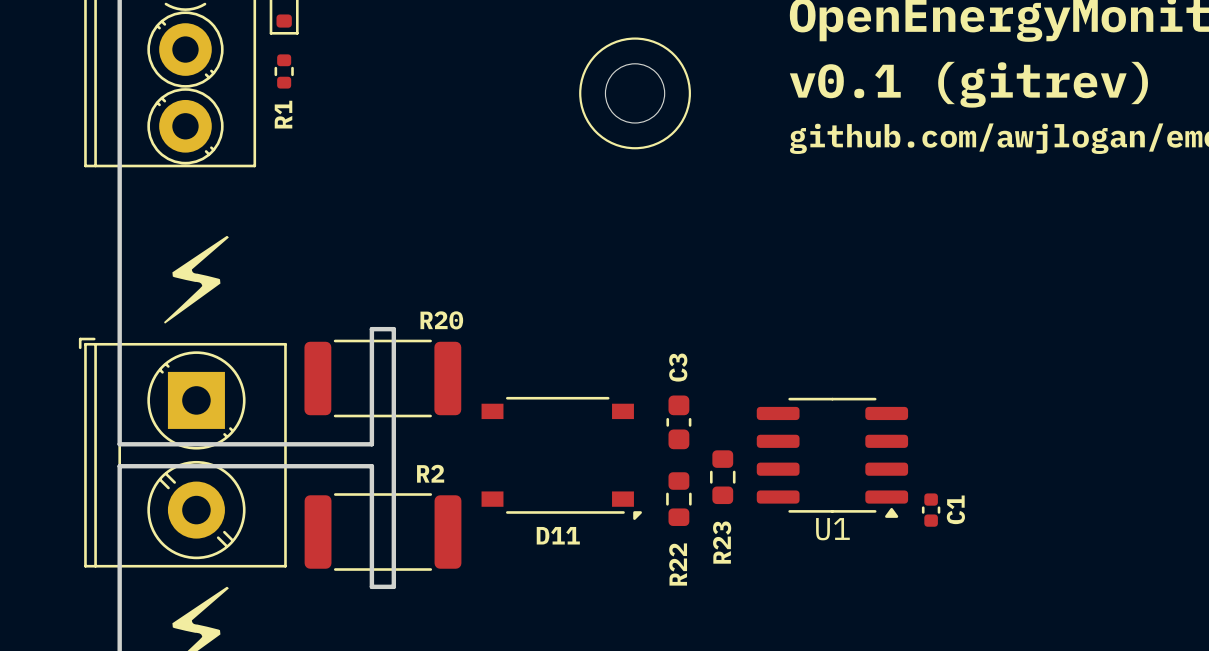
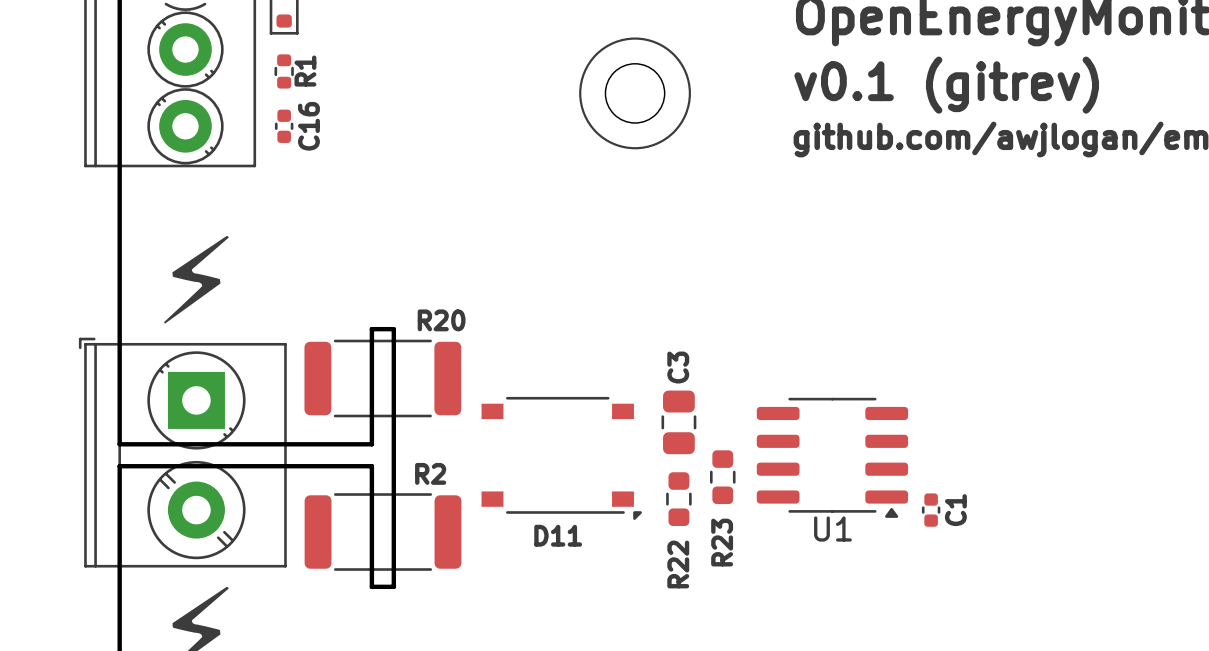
R1 name position: R1 (283, 114) -> R1 (305, 71)
C16: none -> (284, 126)
C3 footprint: [666, 395, 692, 450] -> [661, 390, 697, 455]

